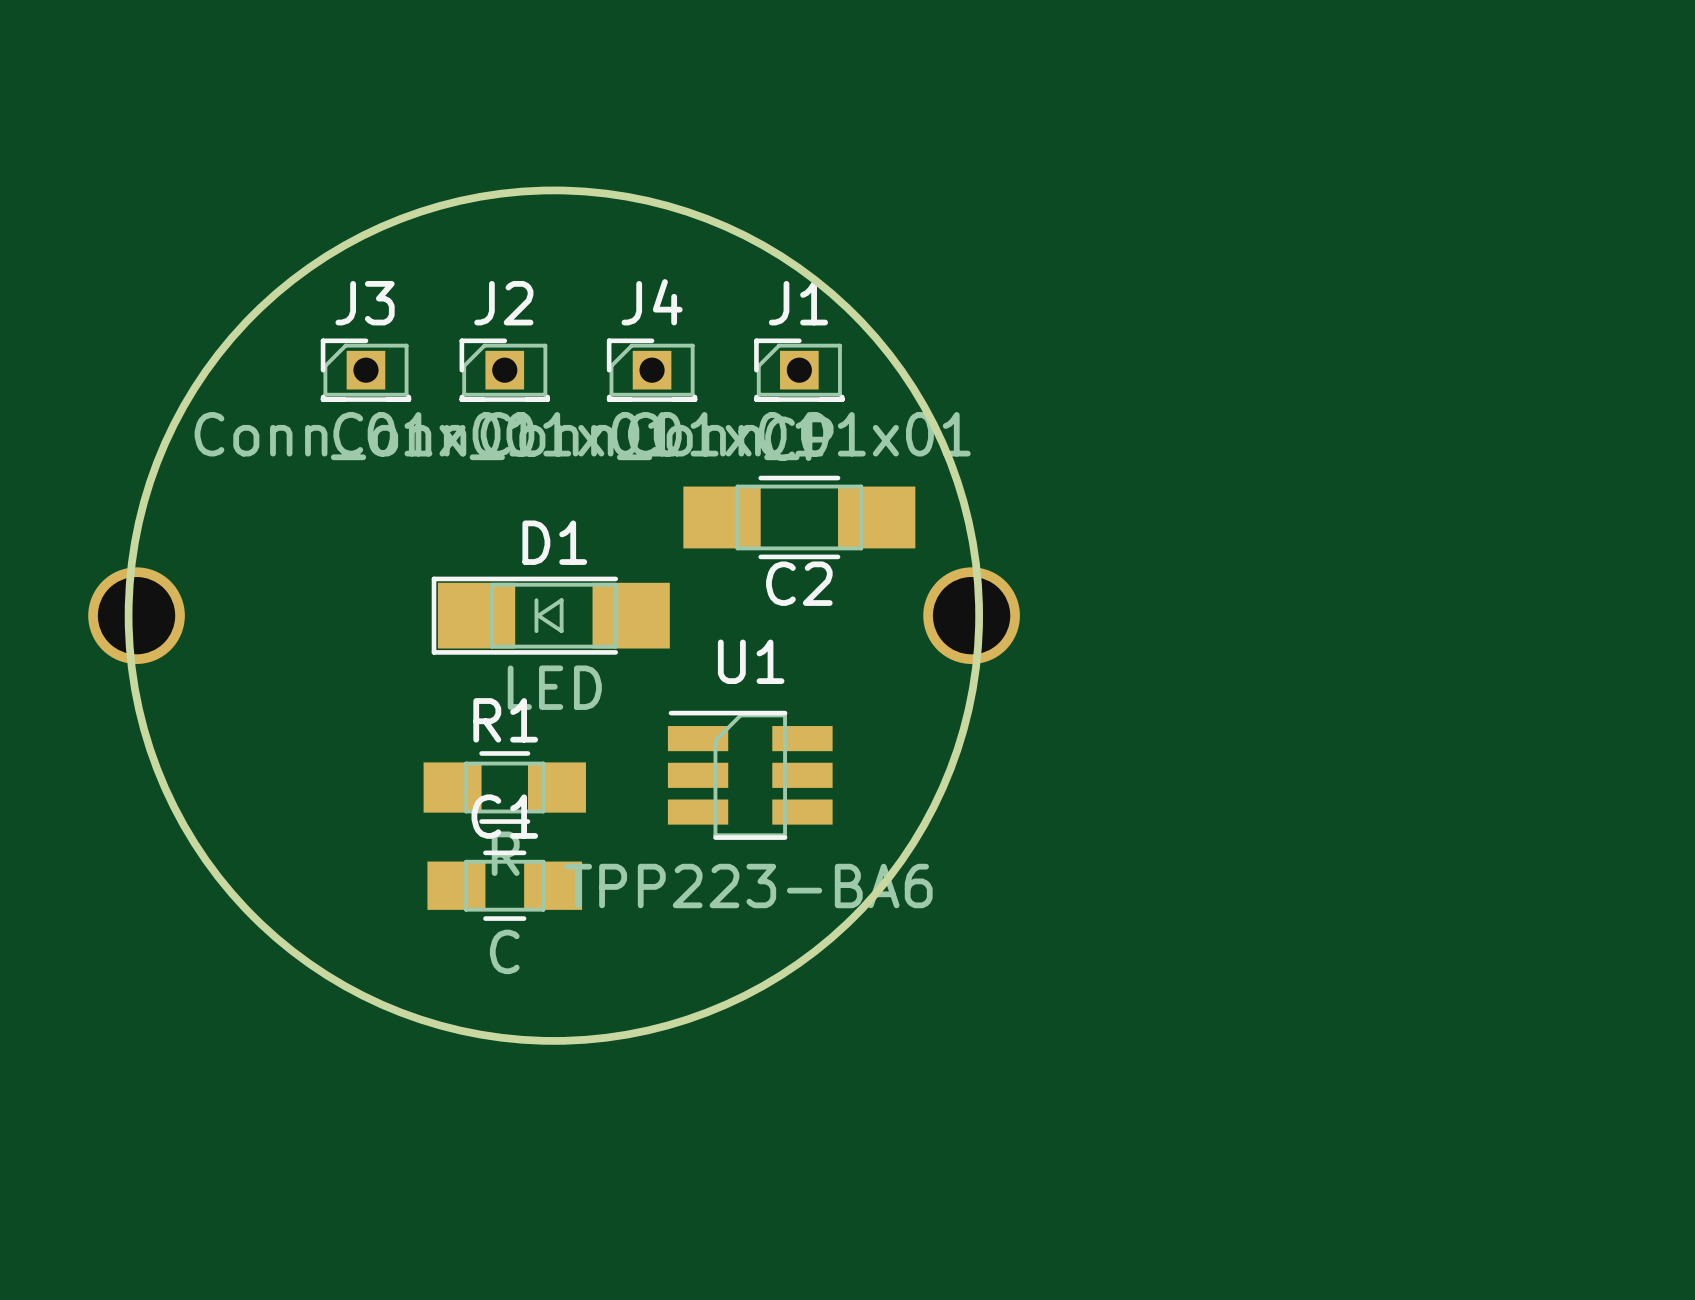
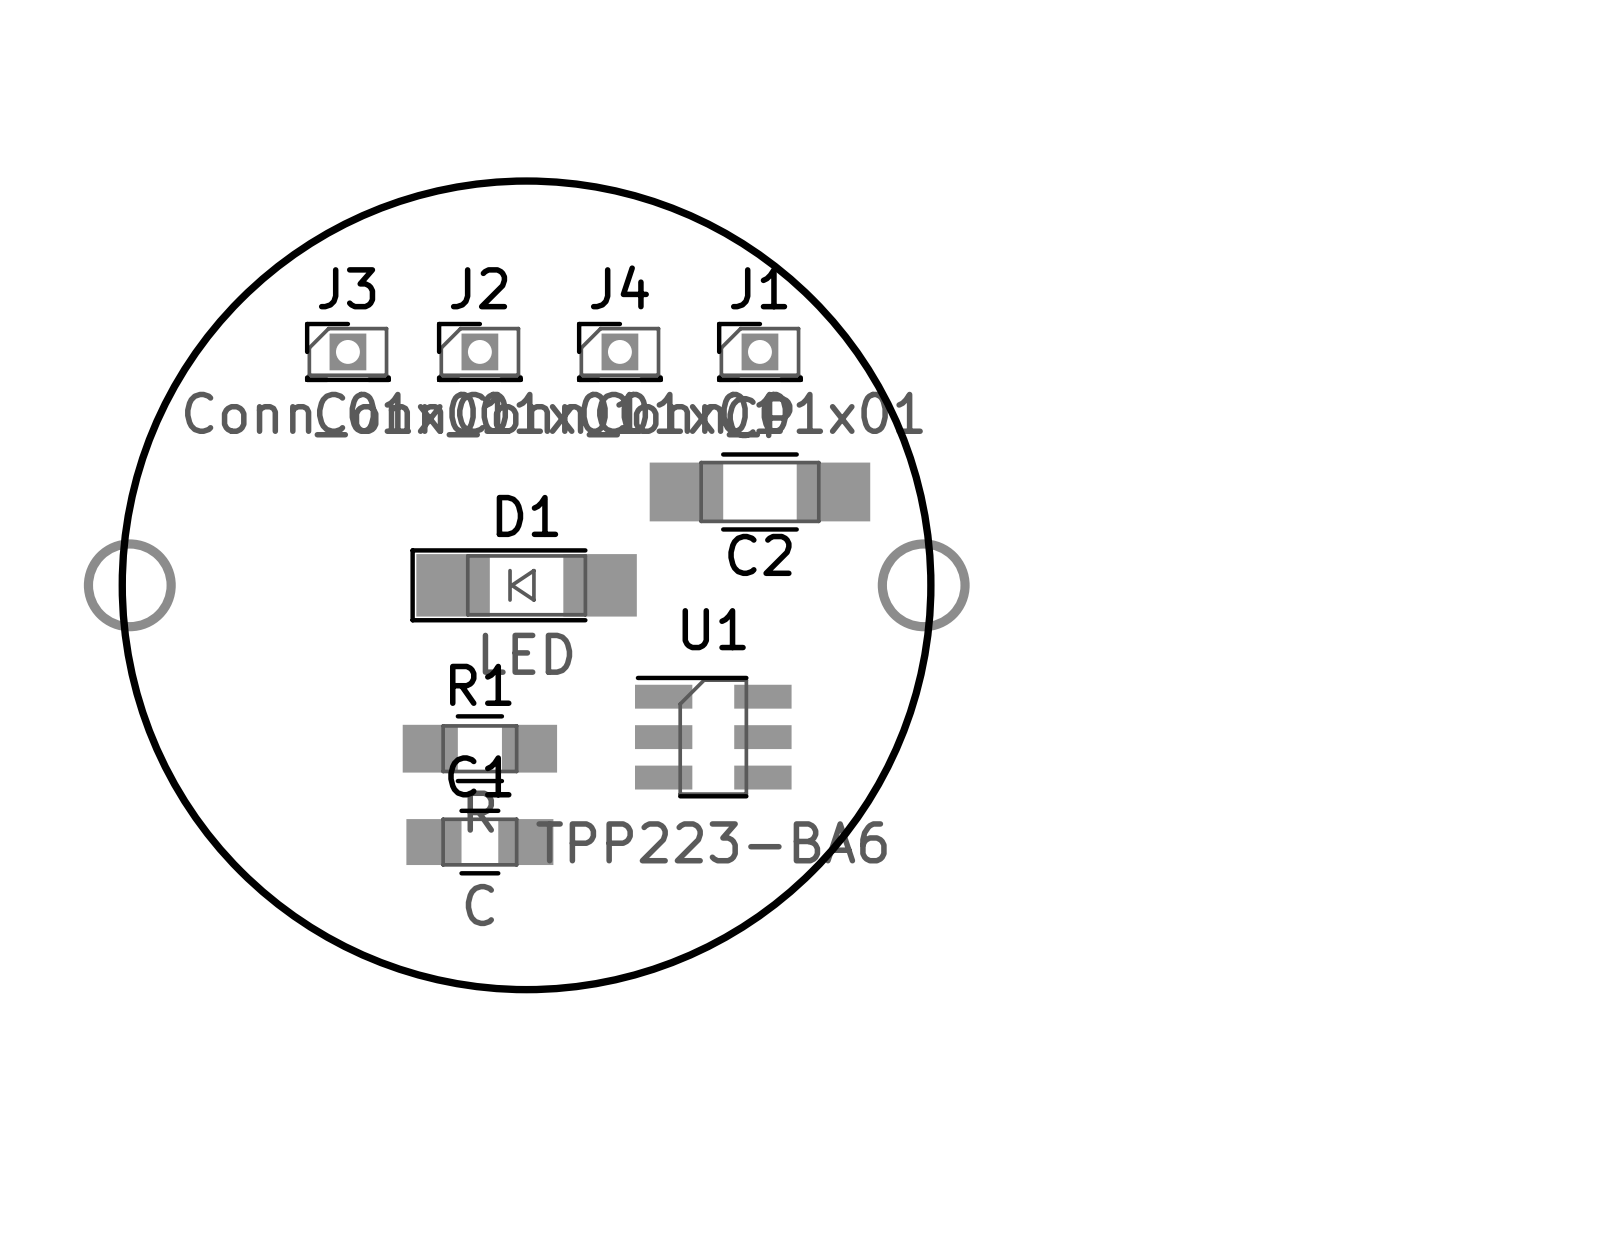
U1 footprint: [667, 710, 833, 840] -> [634, 675, 792, 799]

